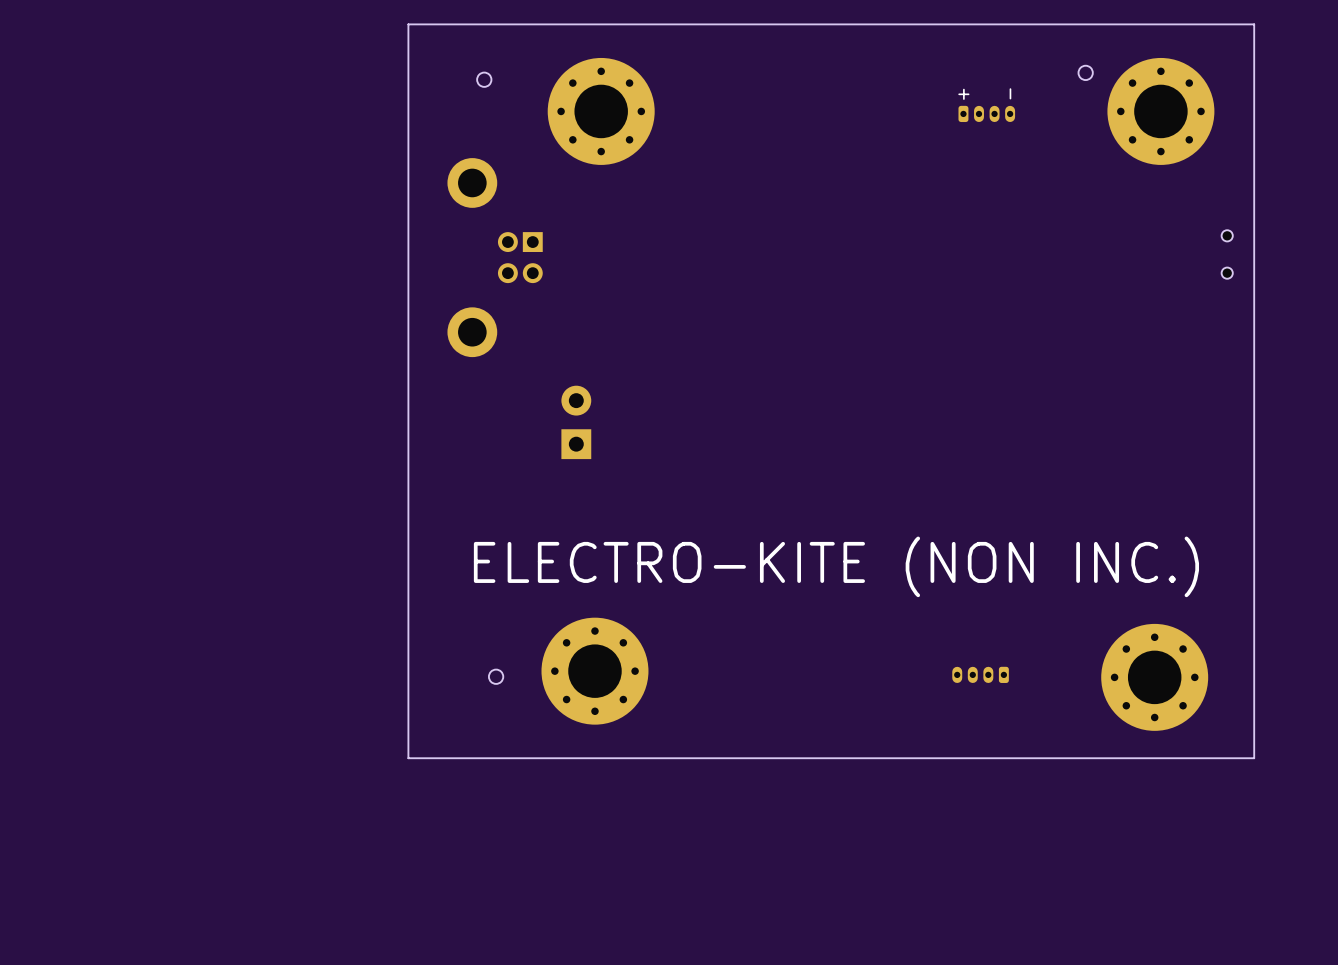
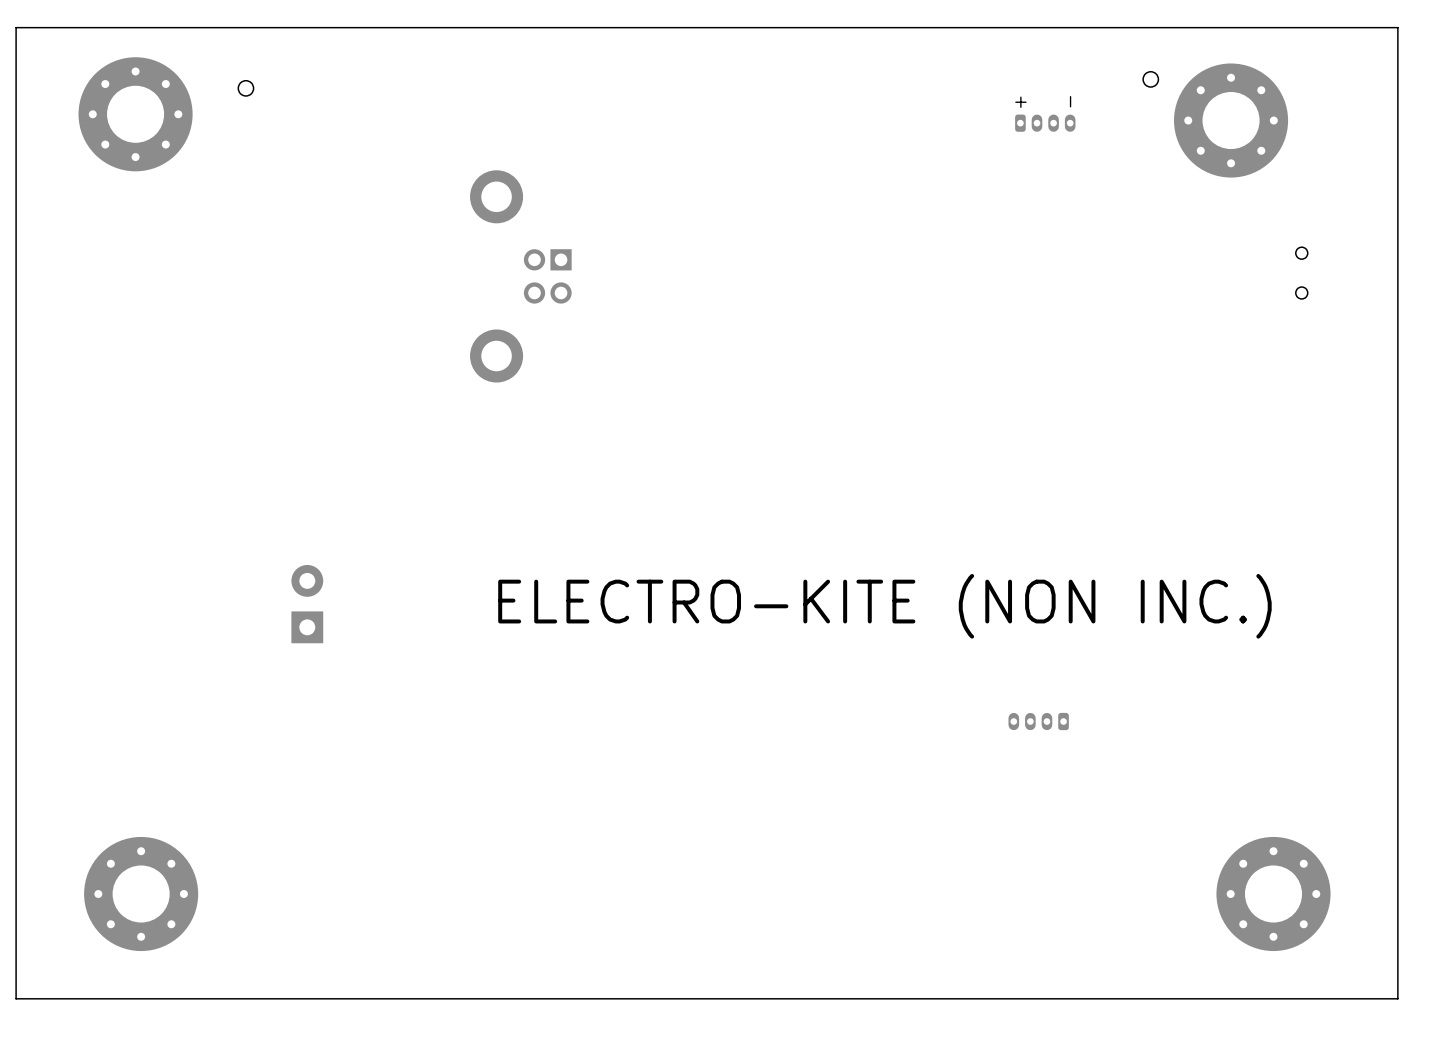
board edge: (1254, 24) (1254, 758) (408, 758) (408, 24) -> (1330, 27) (1397, 27) (1397, 998) (16, 998) (16, 27) (428, 27)
round board edge position: (484, 79) -> (245, 88)
part: none -> (135, 114)
part: (601, 111) -> none
part: (576, 422) -> none
part: none -> (307, 604)
round board edge: [488, 669, 504, 685] -> none
part: (594, 671) -> none
part position: (1154, 677) -> (1273, 894)
part: none -> (141, 894)

